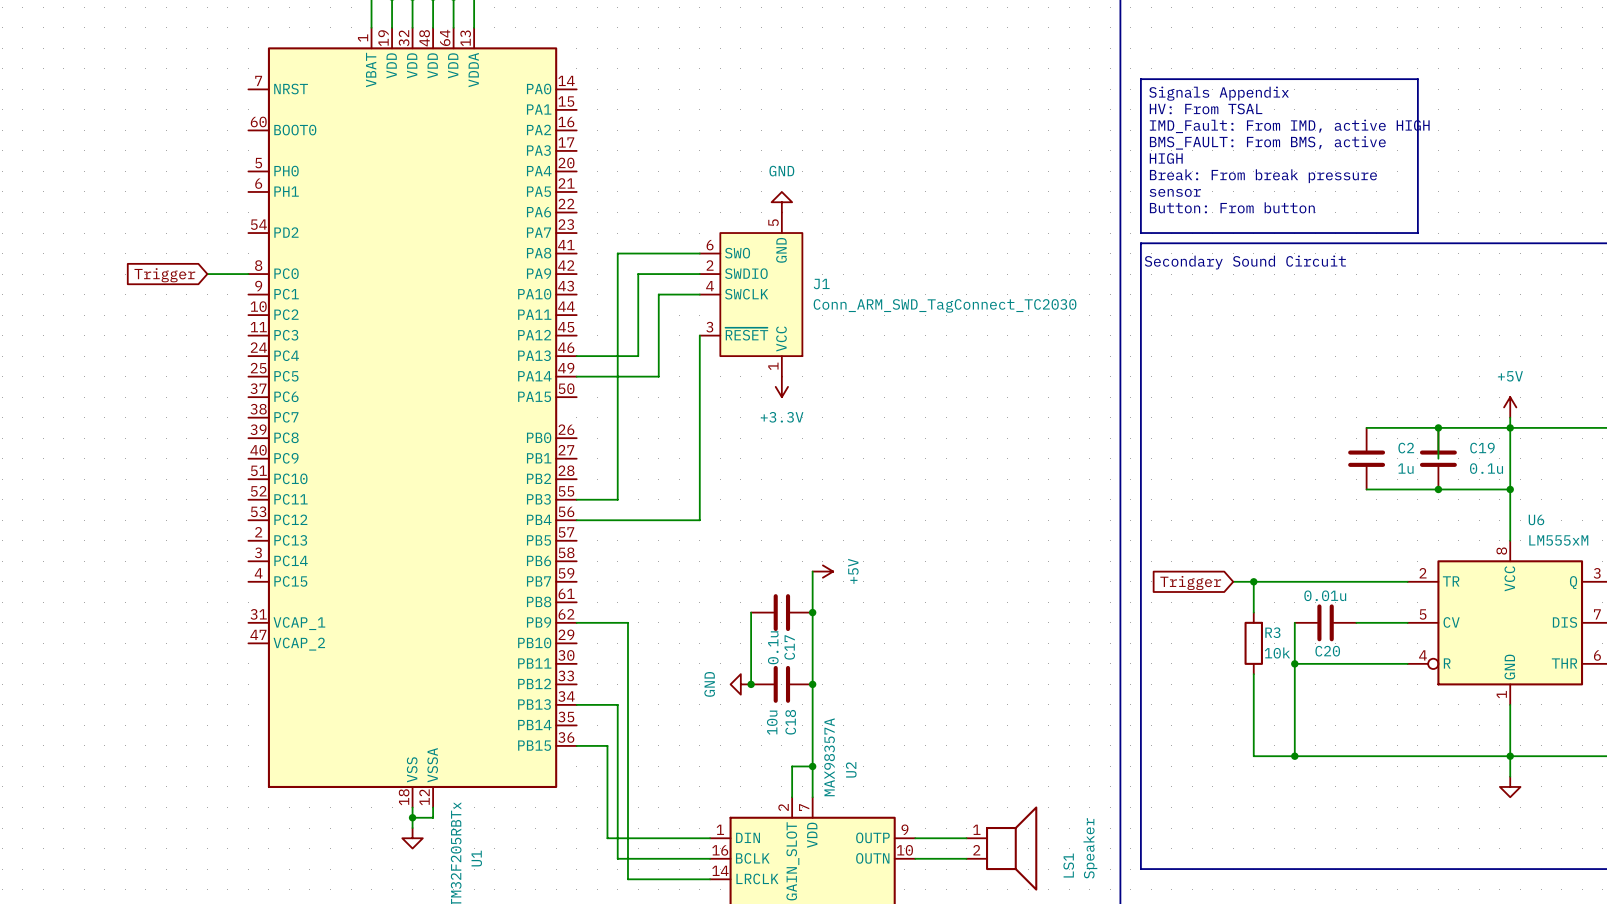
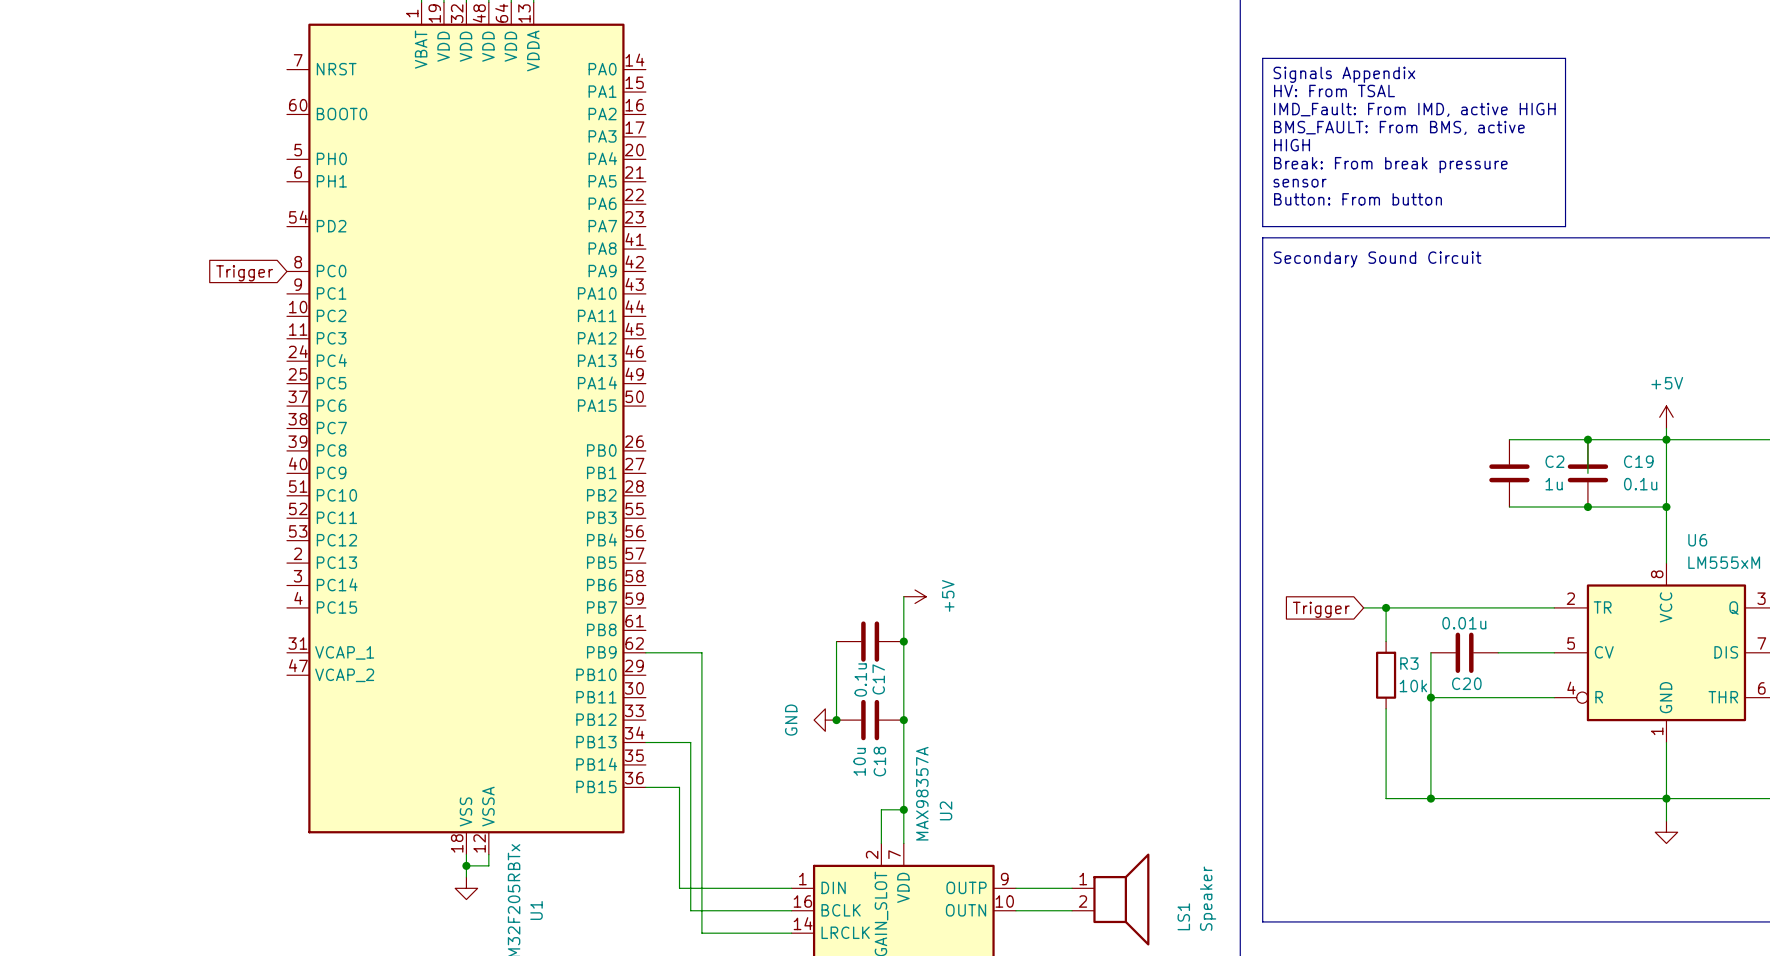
power symbol: GND (781, 202) -> none
wire: (699, 253) (617, 253) (617, 499) (576, 499) -> none
wire: (207, 274) (248, 274) -> none
wire: (699, 274) (638, 274) (638, 356) (576, 356) -> none
global label position: Trigger (164, 275) -> Trigger (244, 273)
wire: (699, 294) (658, 294) (658, 376) (576, 376) -> none
J1: Conn_ARM_SWD_TagConnect_TC2030 (751, 294) -> none
wire: (699, 335) (699, 520) (576, 520) -> none
power symbol: +3.3V (781, 386) -> none

